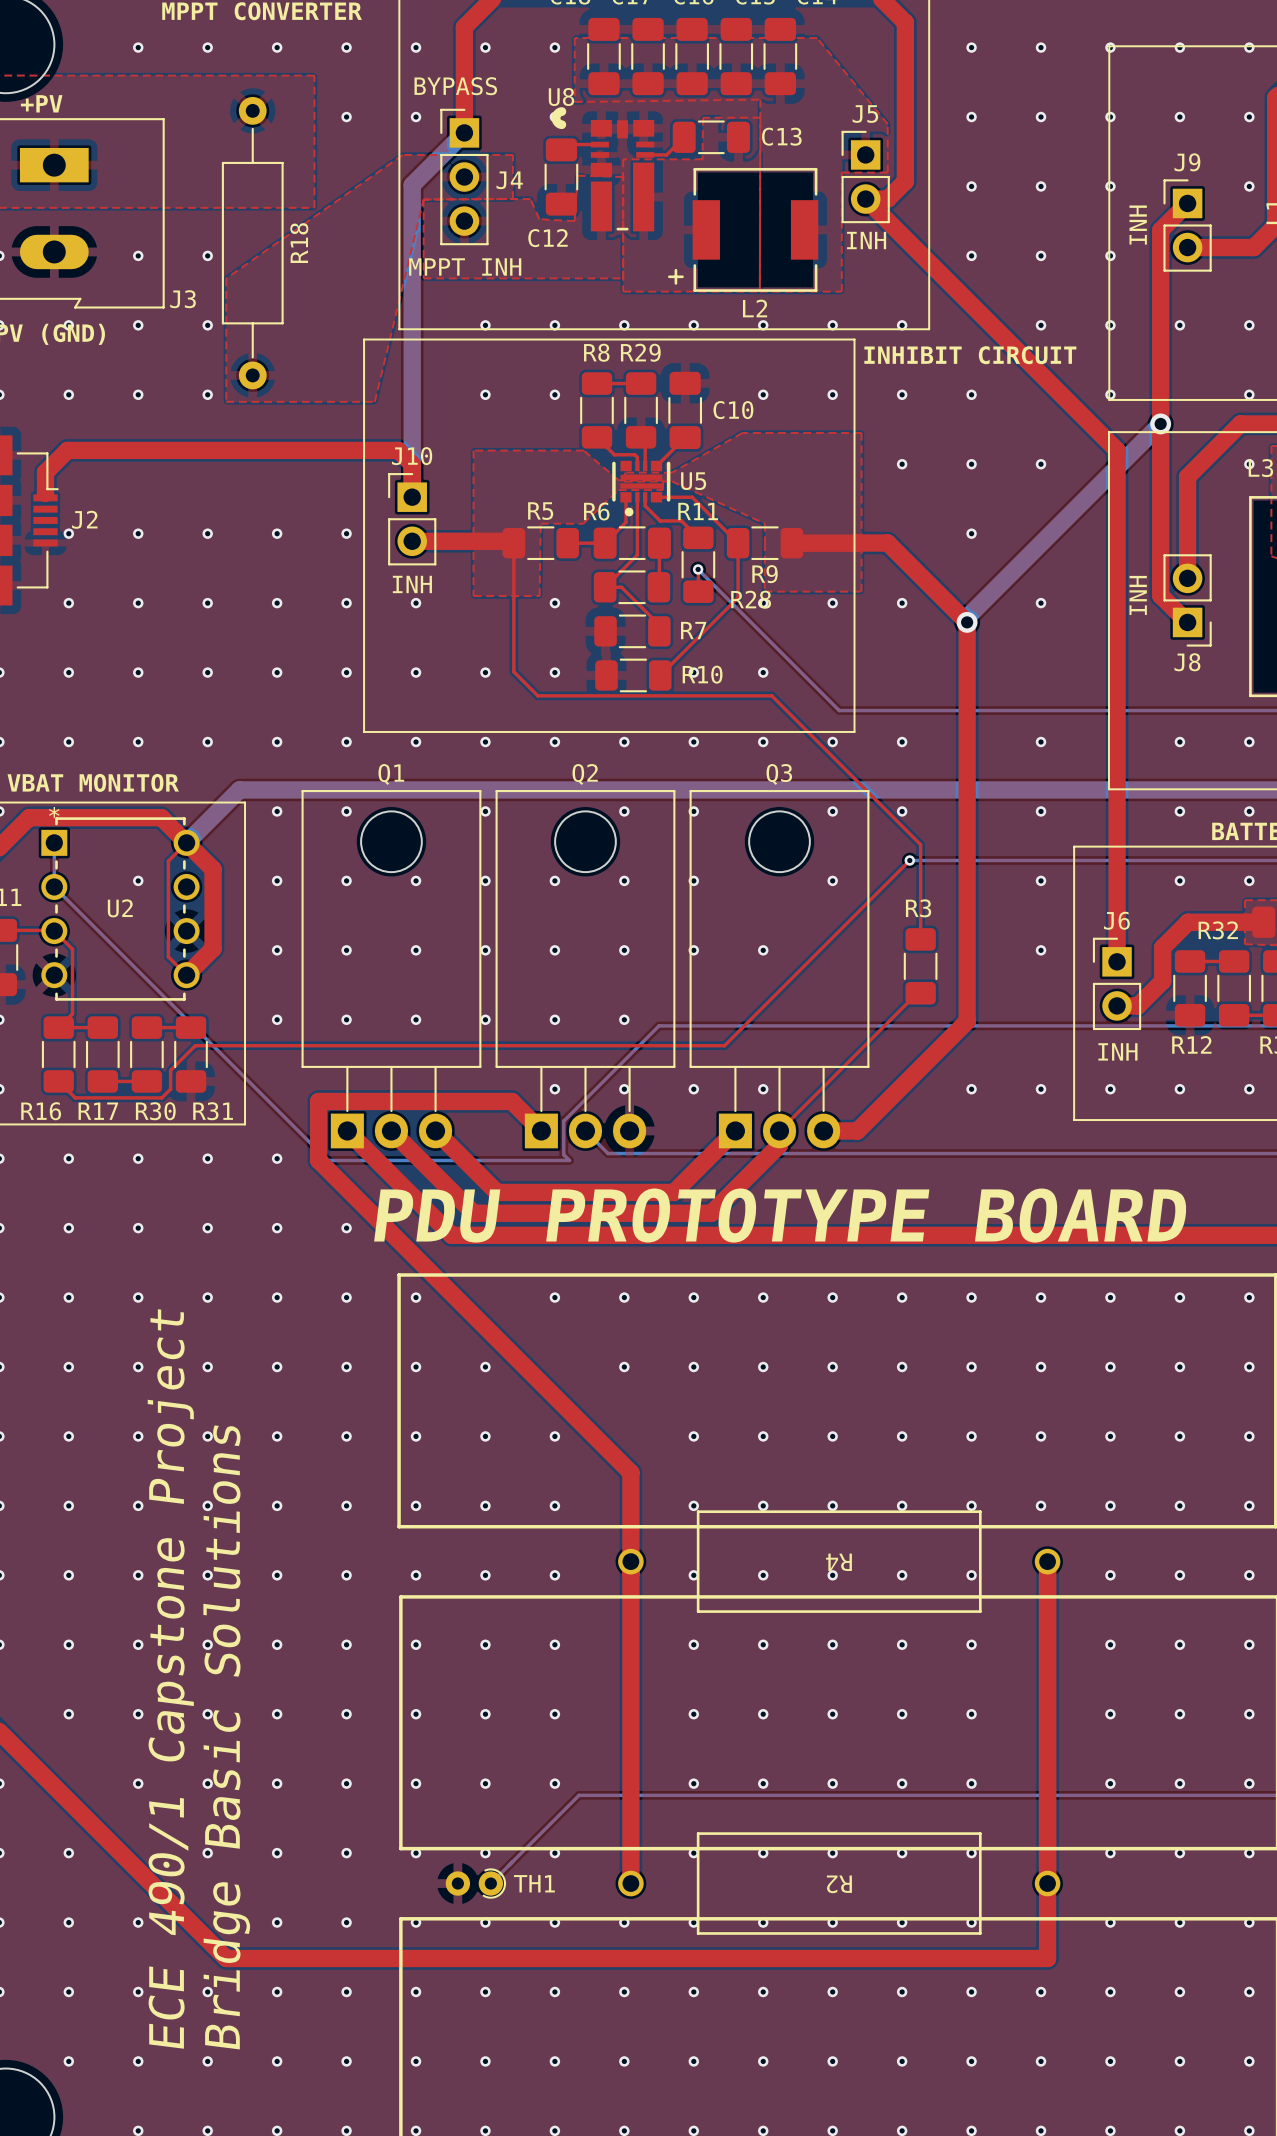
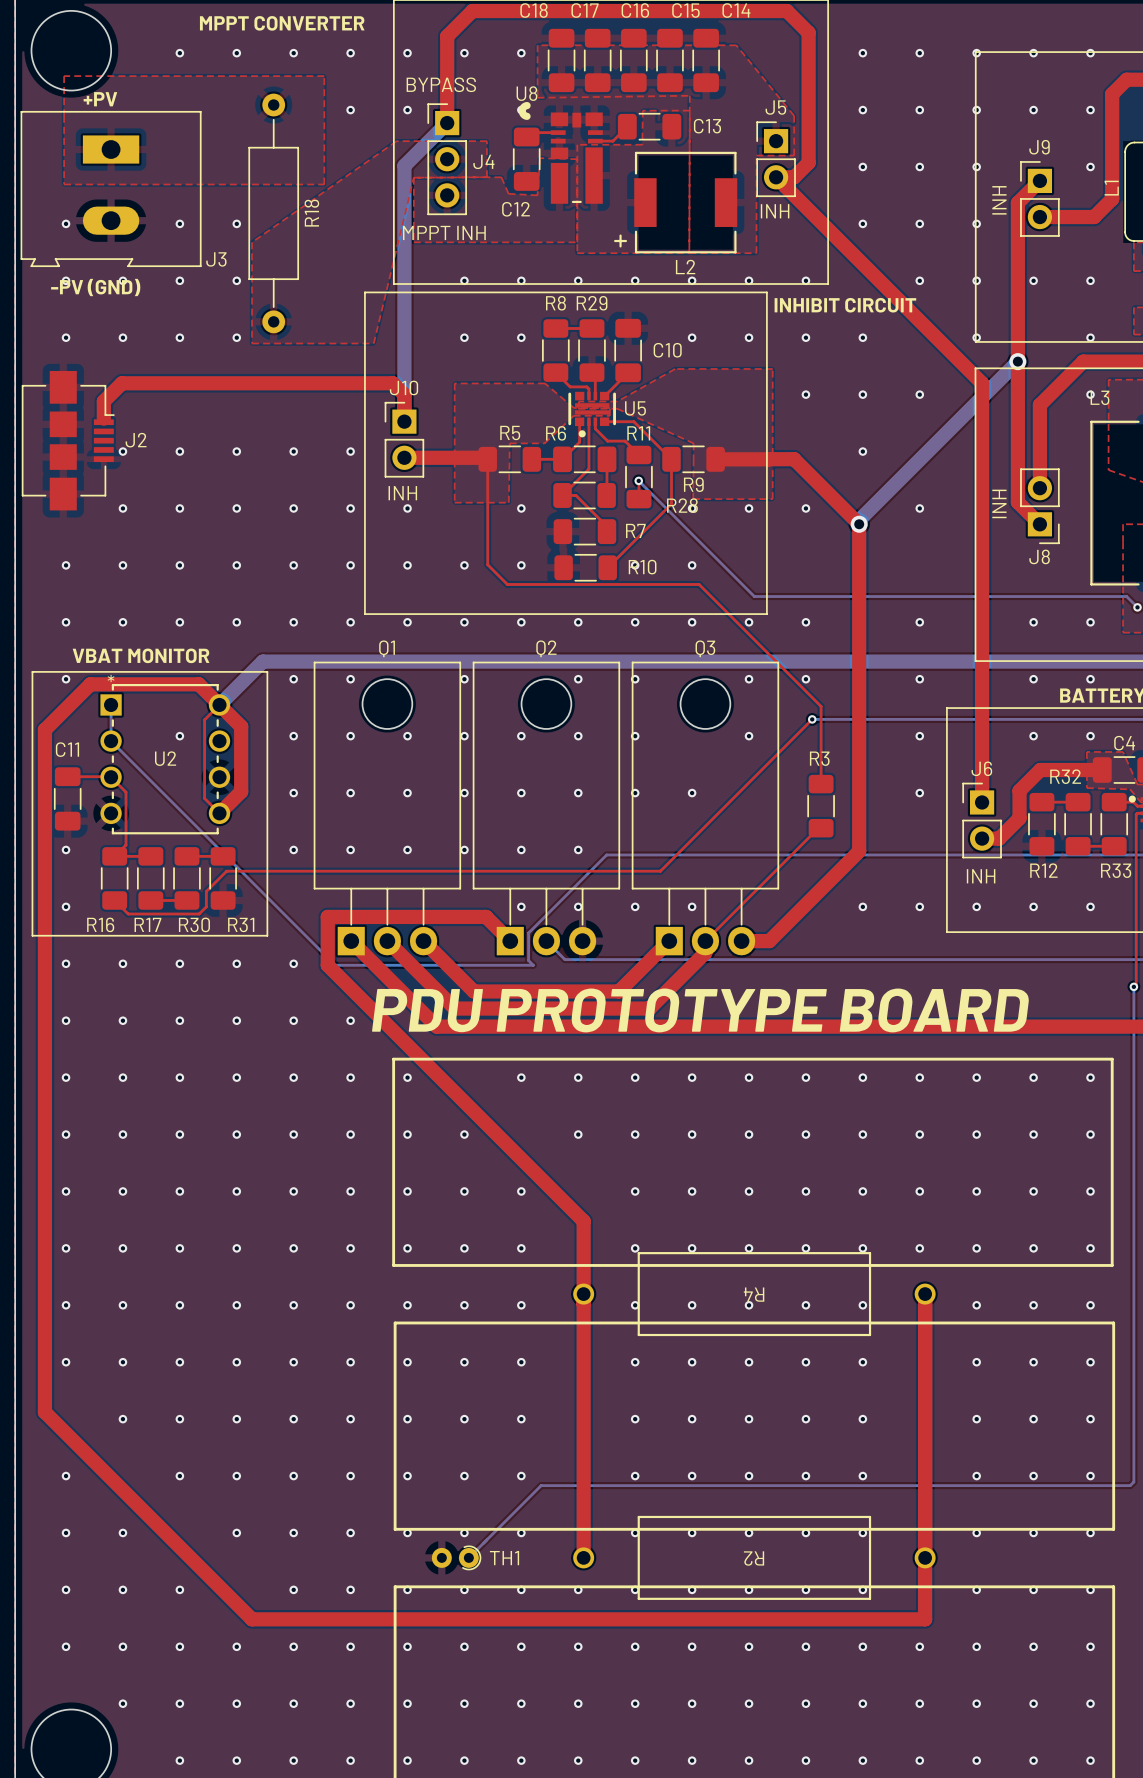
text: ECE 490/1 Capstone Project (170, 1678) -> none
text: Bridge Basic Solutions (226, 1737) -> none

